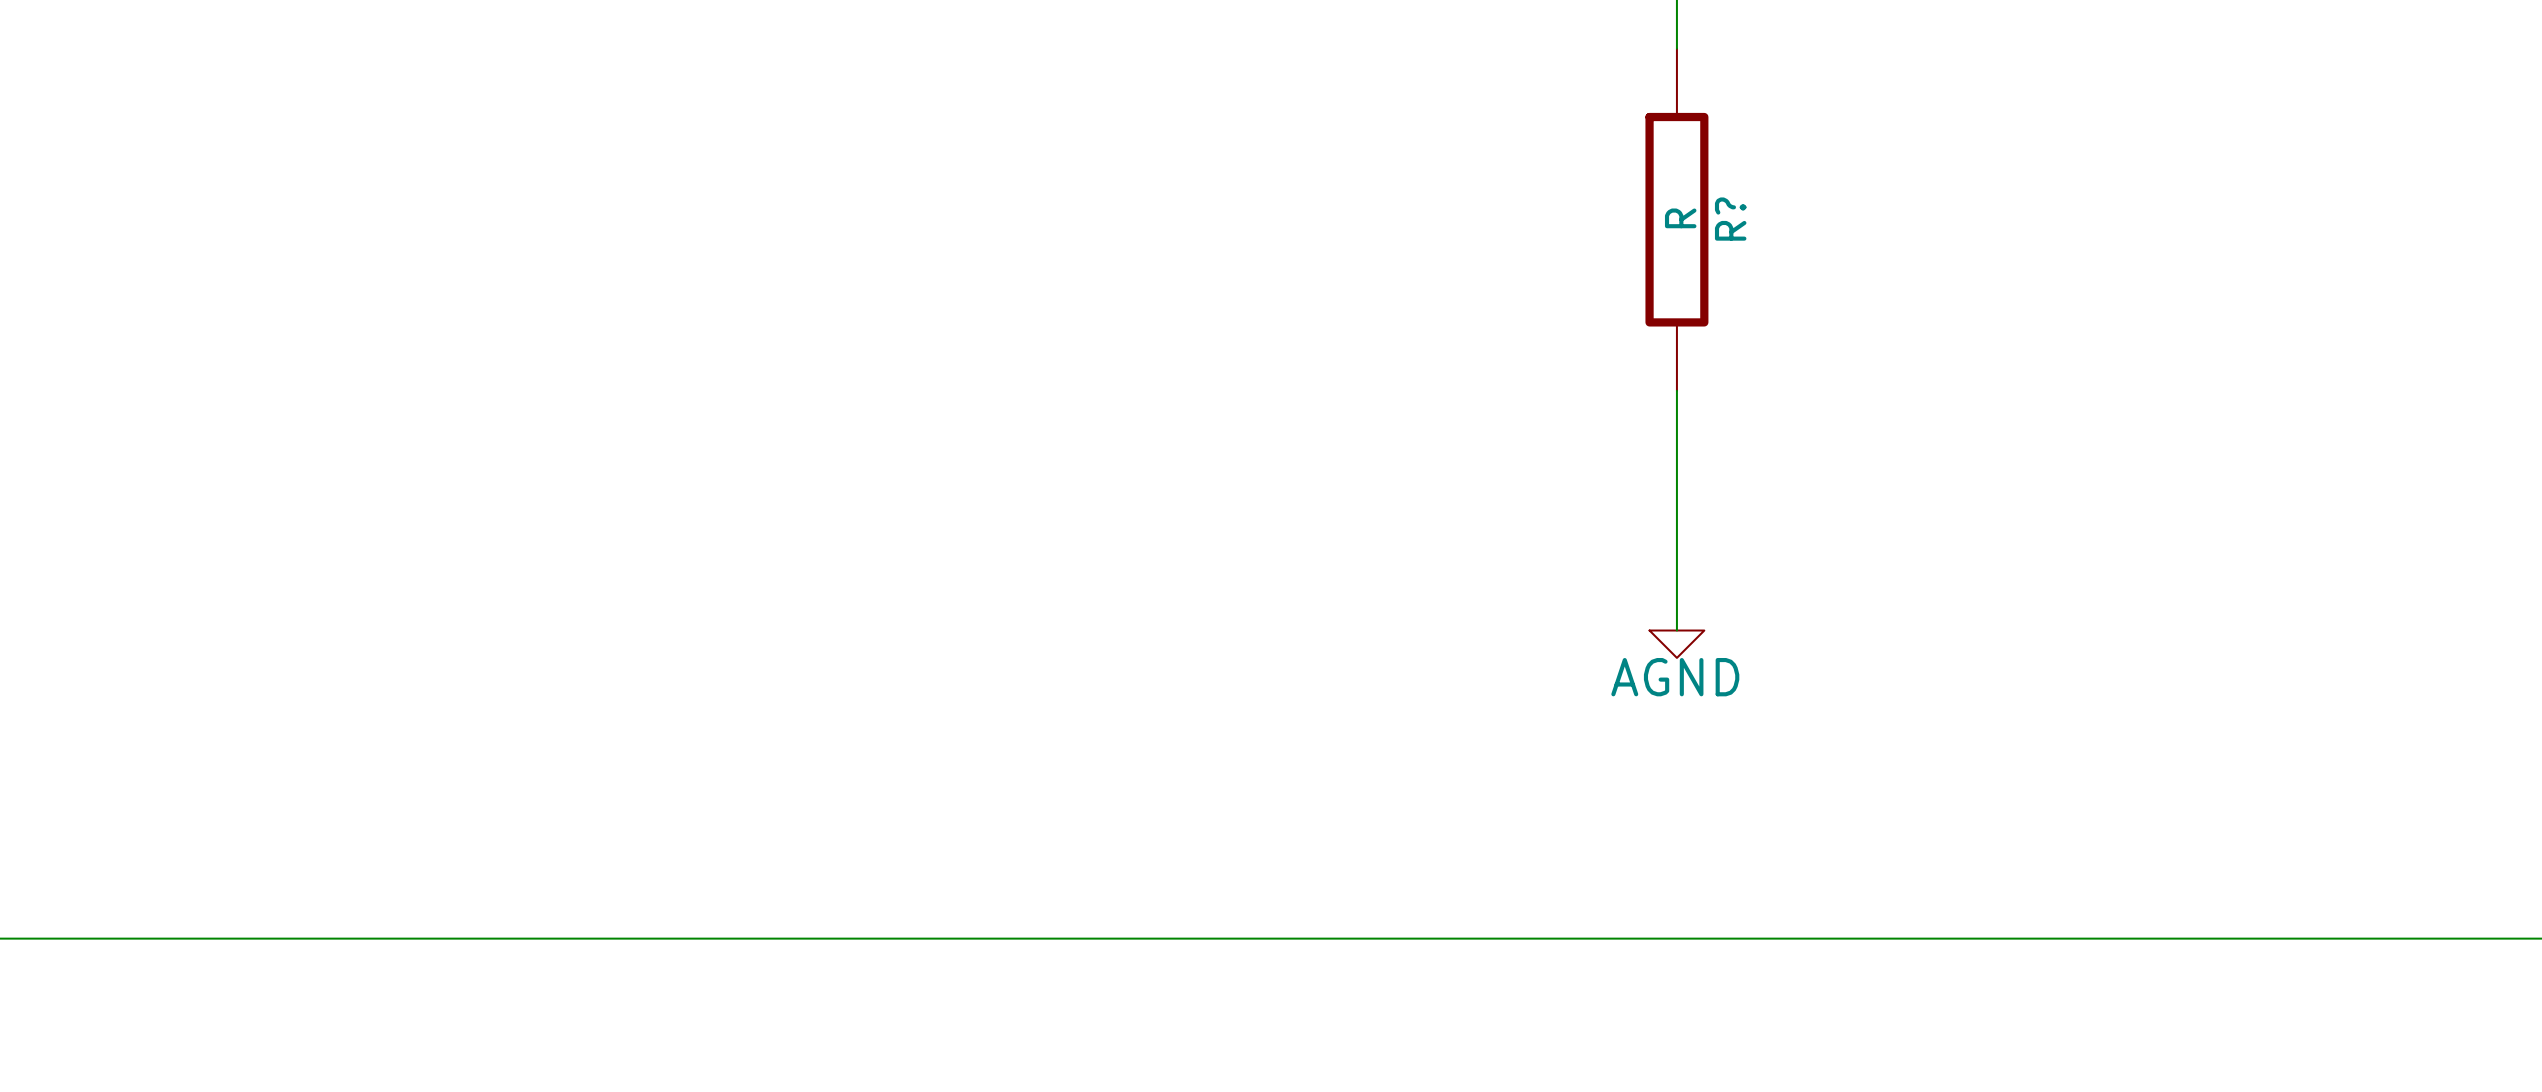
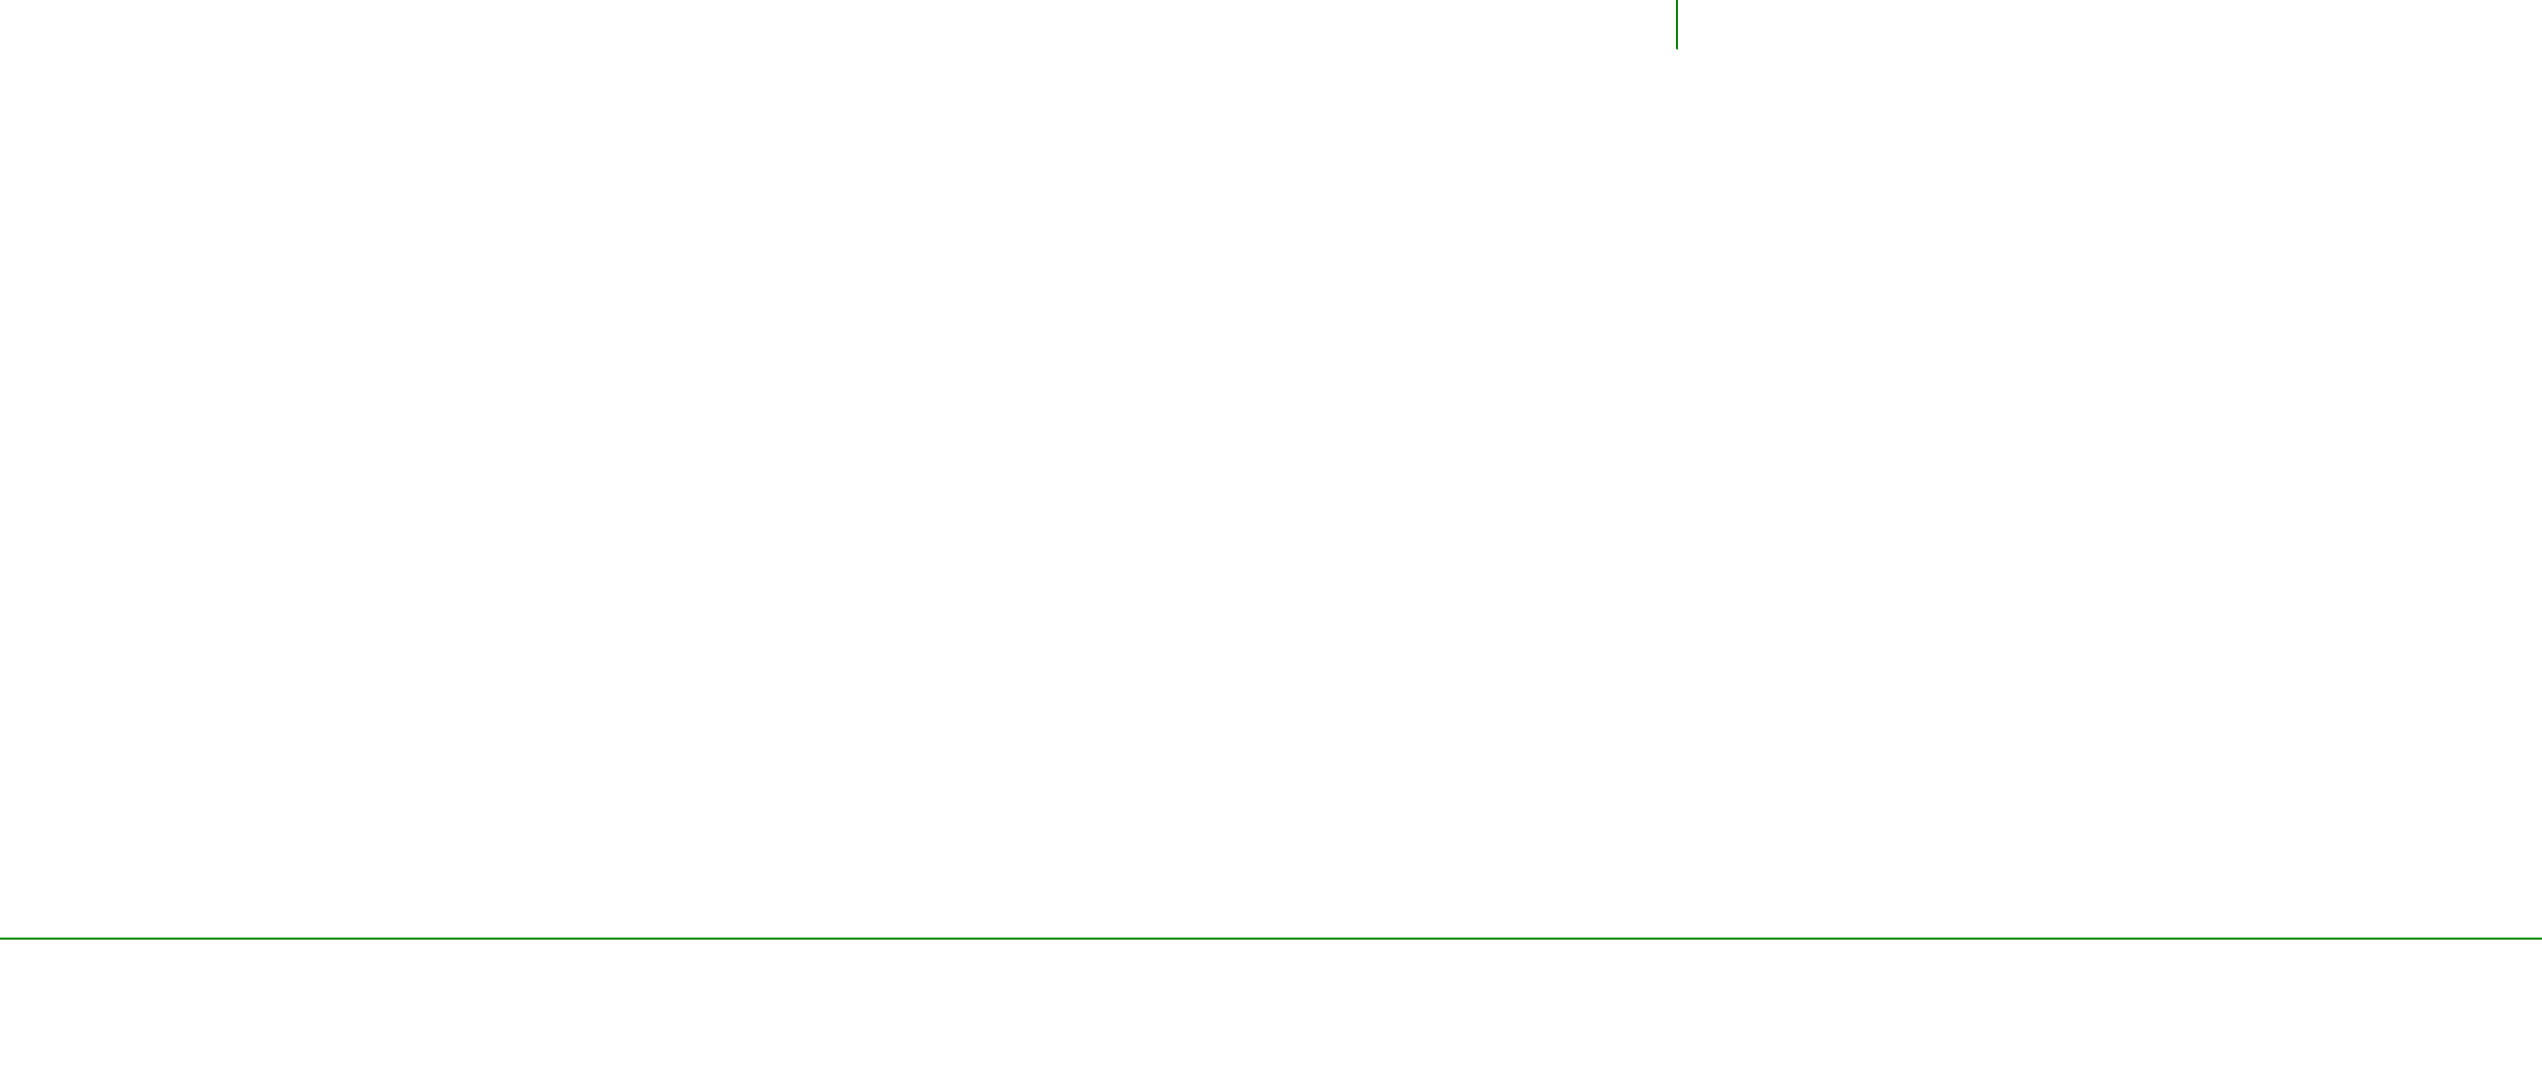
R?: R (1676, 219) -> none
wire: (1676, 390) (1676, 630) -> none
power symbol: AGND (1676, 644) -> none

